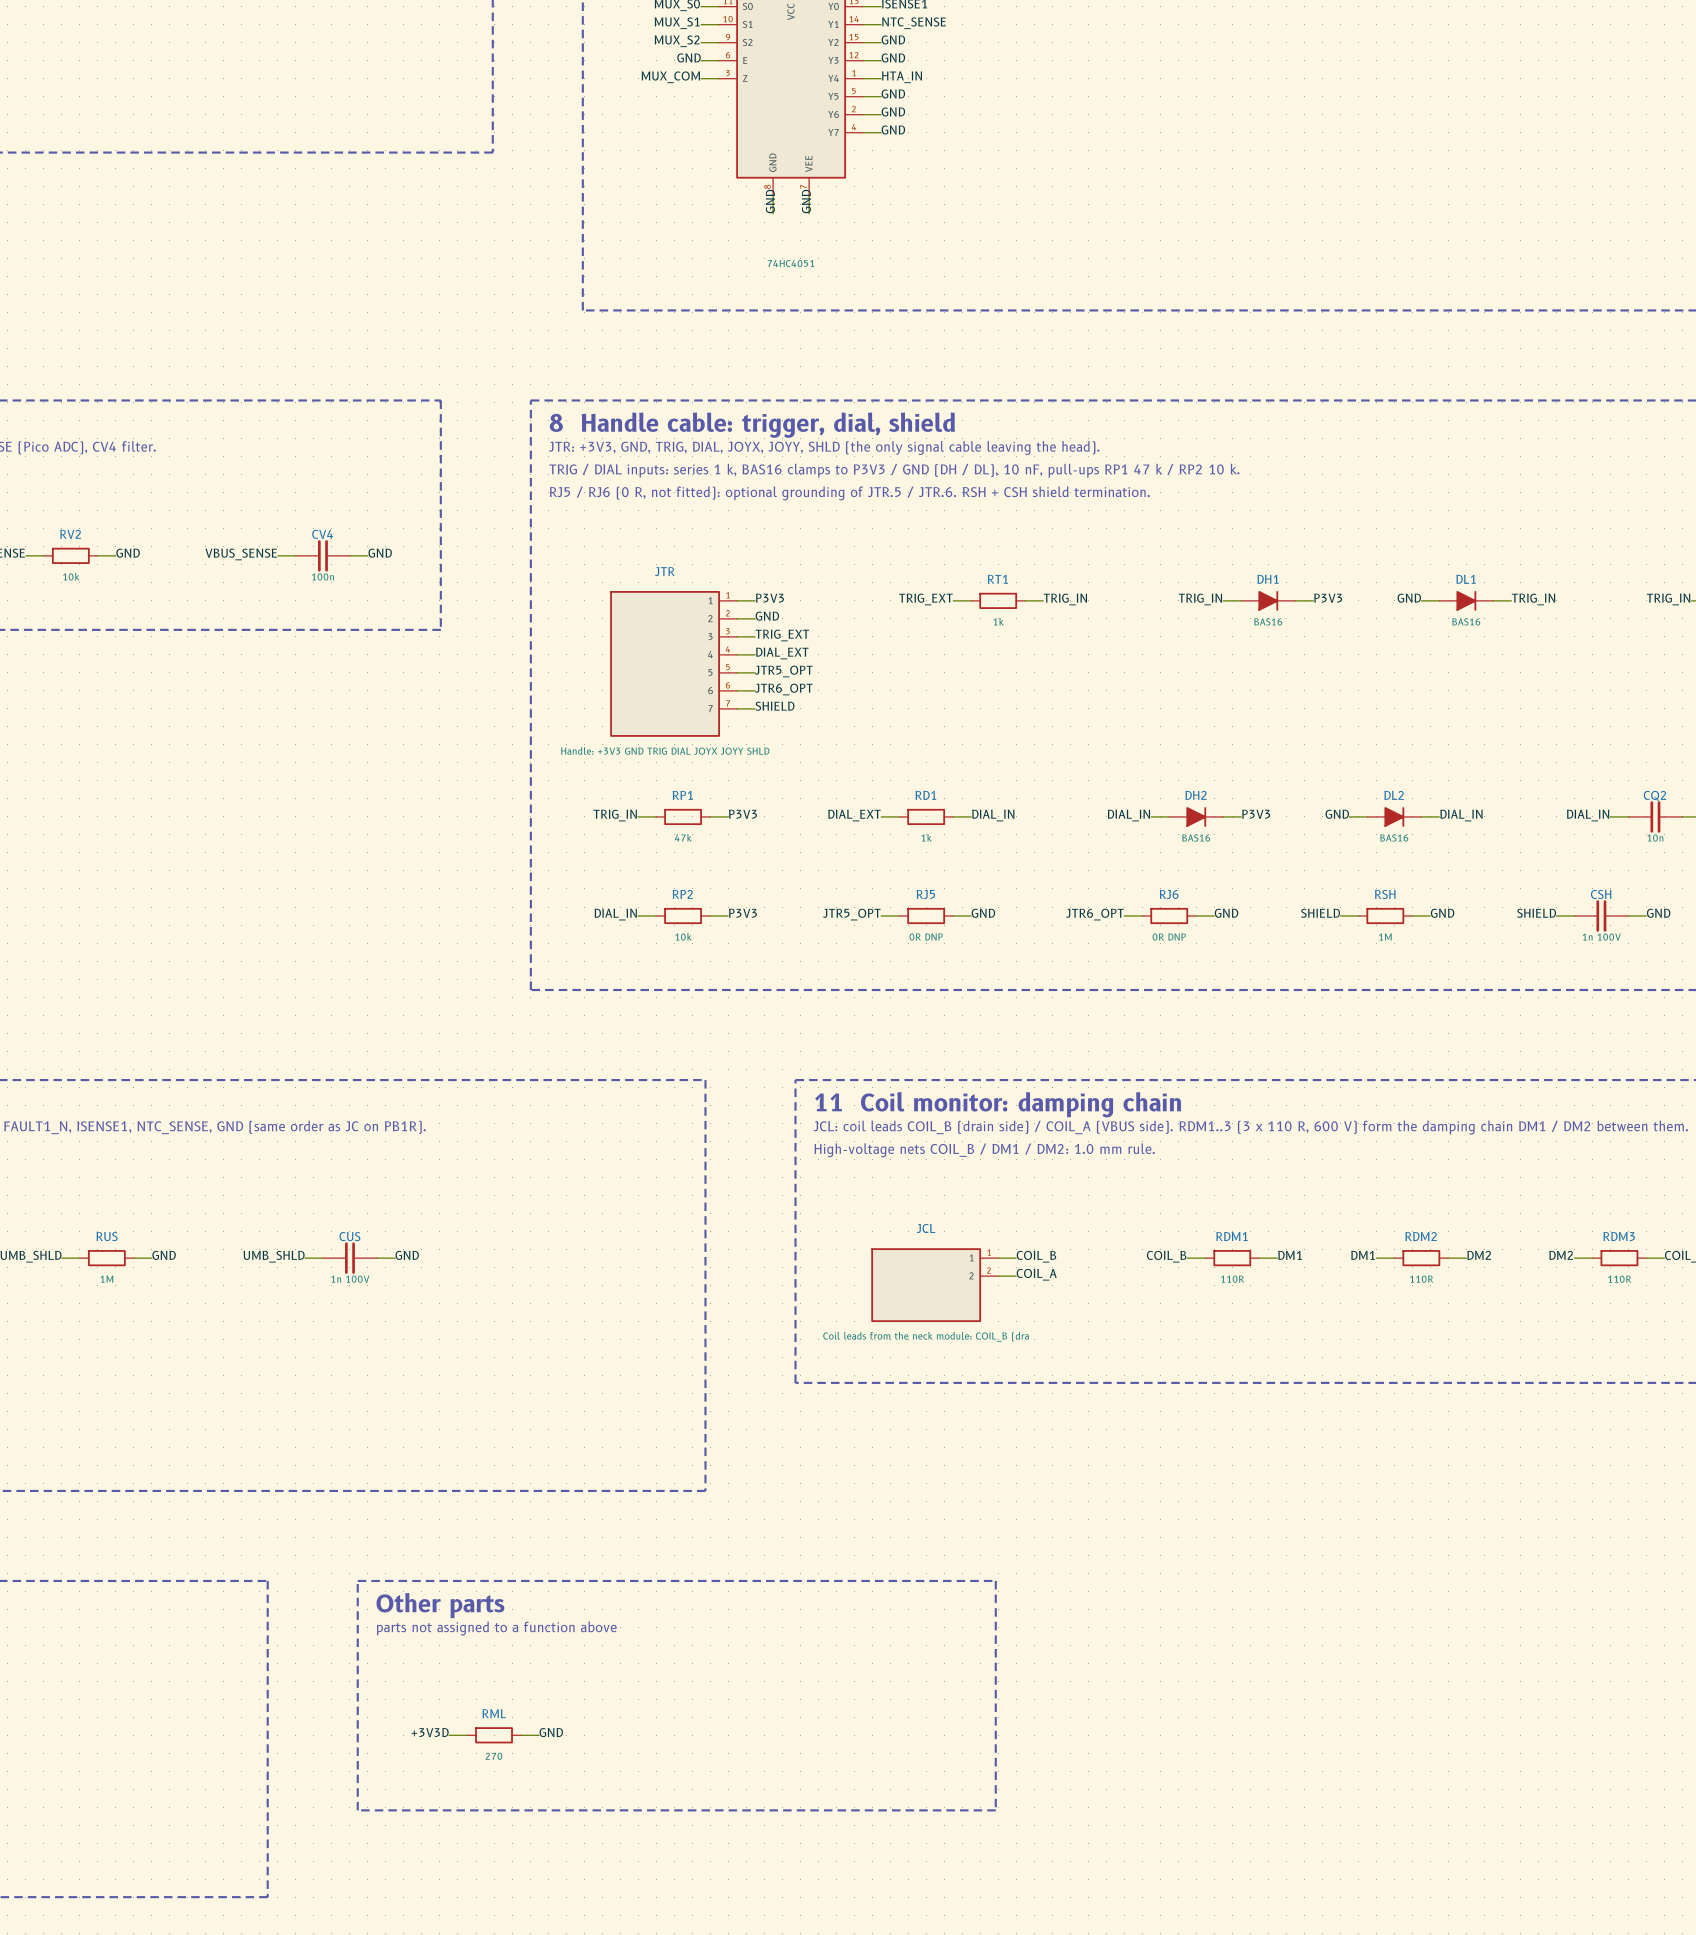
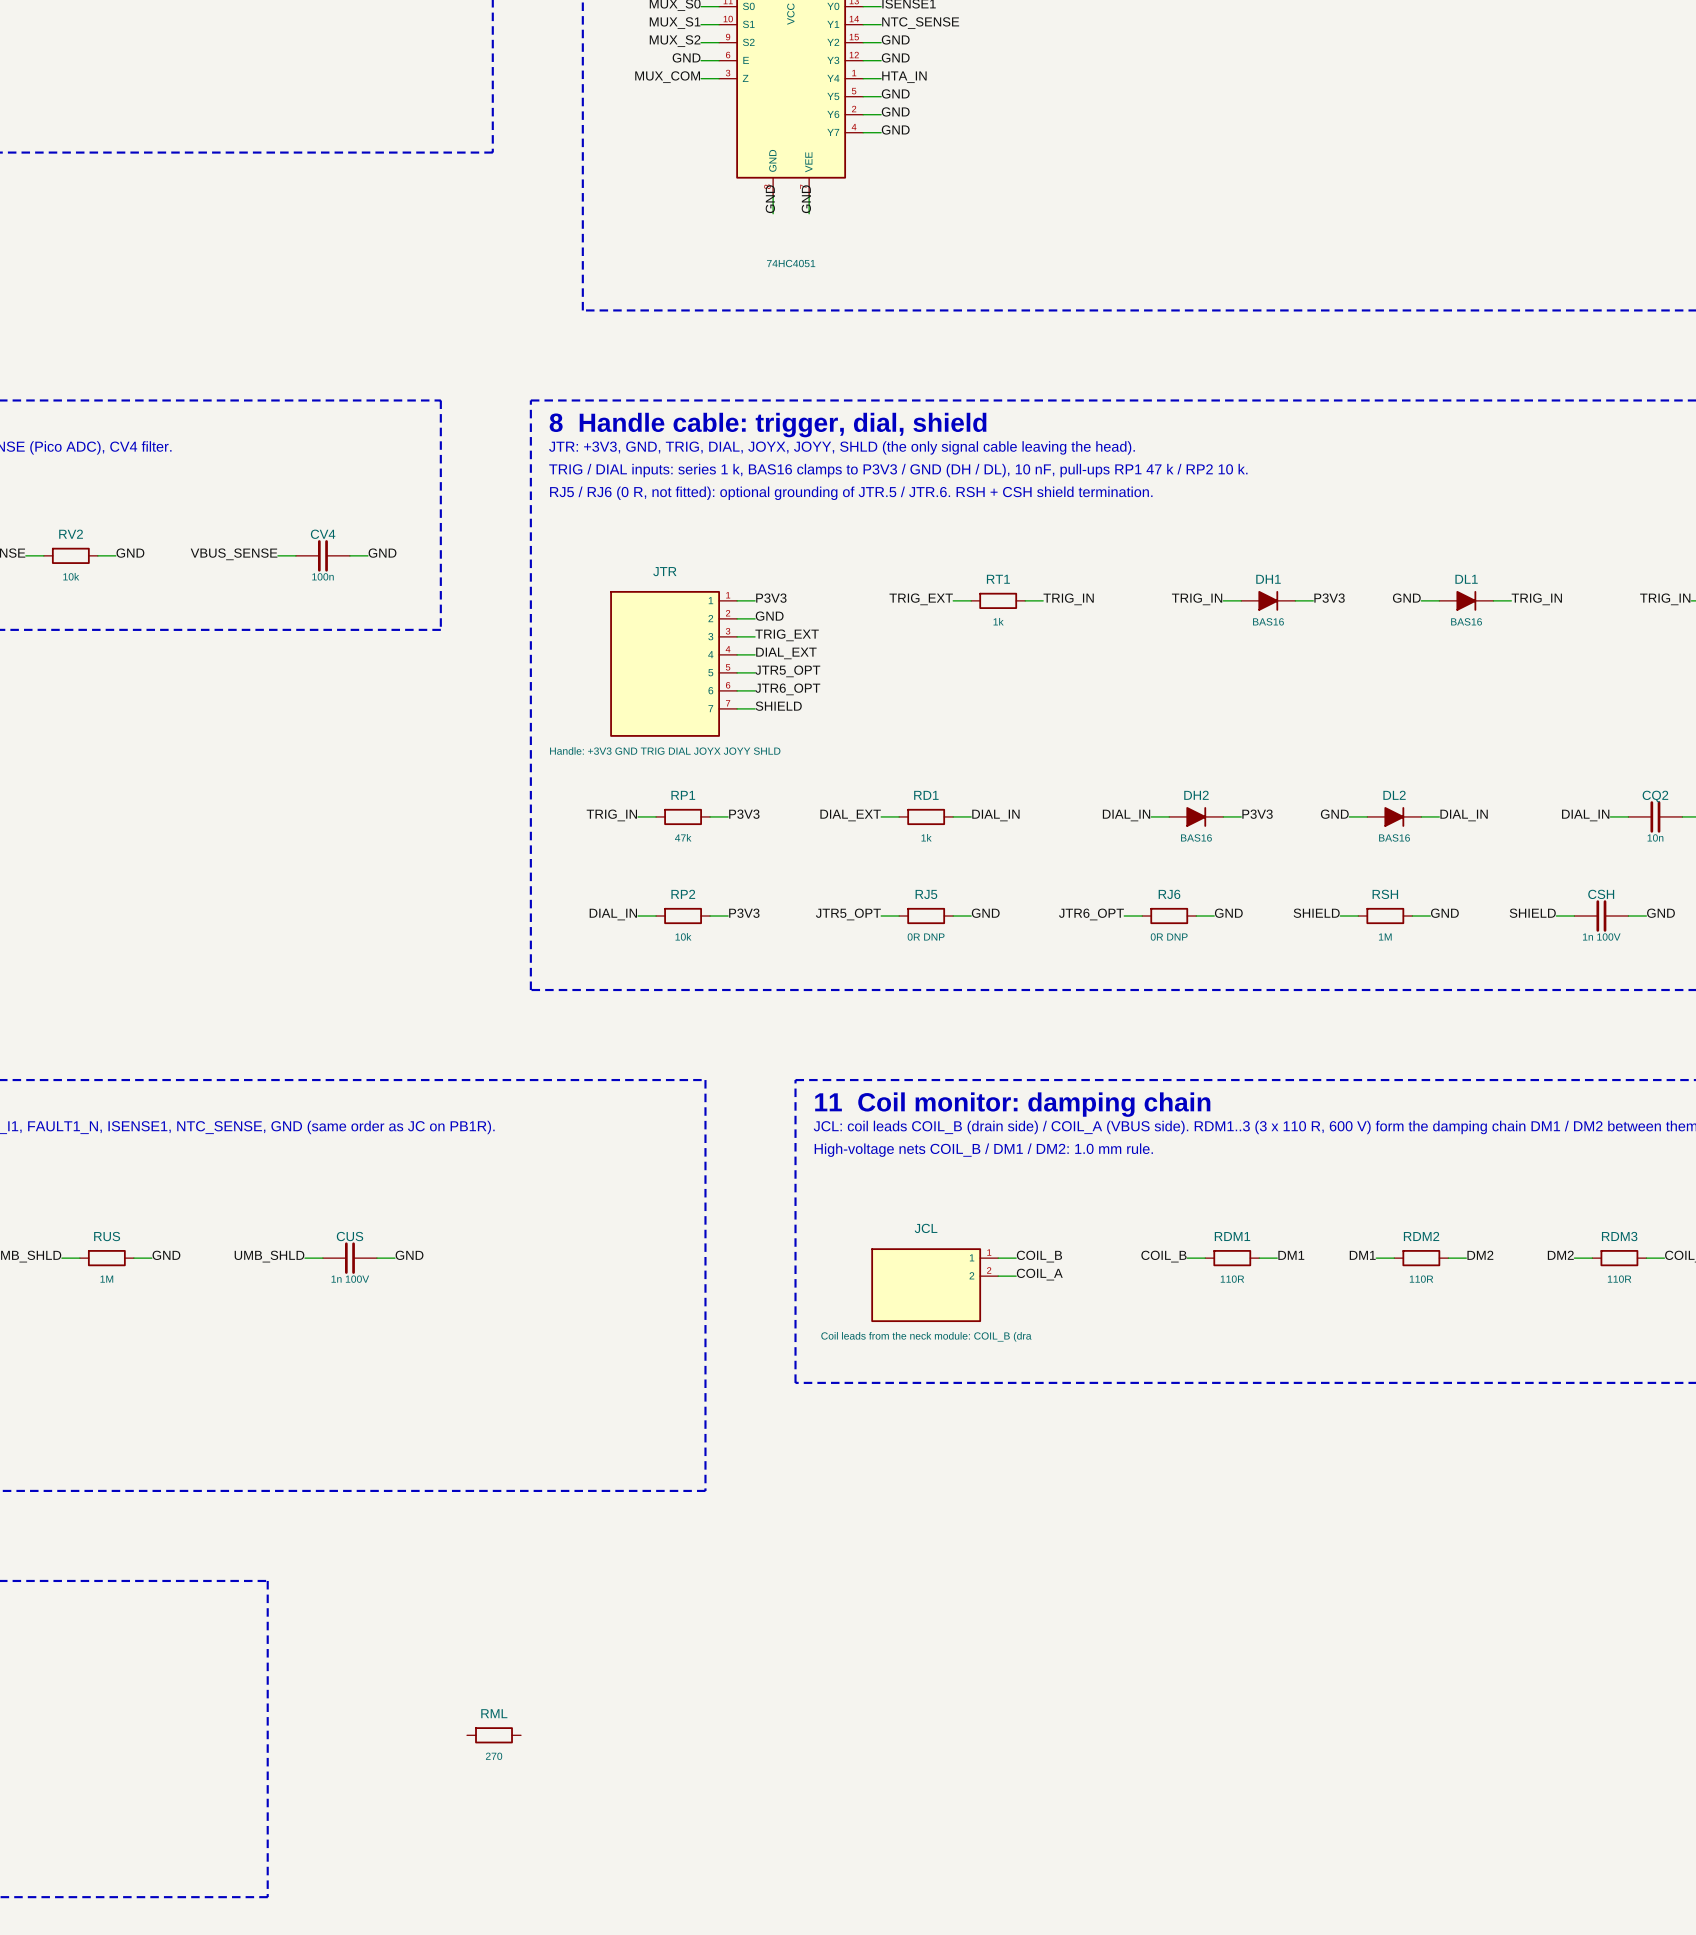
line: (357, 1580) (995, 1580) (995, 1810) (357, 1810) (357, 1580) -> none
text: Other parts (440, 1605) -> none
text: parts not assigned to a function above (496, 1628) -> none
label: +3V3D (430, 1732) -> none
label: GND (551, 1732) -> none
wire: (448, 1735) (467, 1735) -> none
wire: (521, 1735) (539, 1735) -> none

